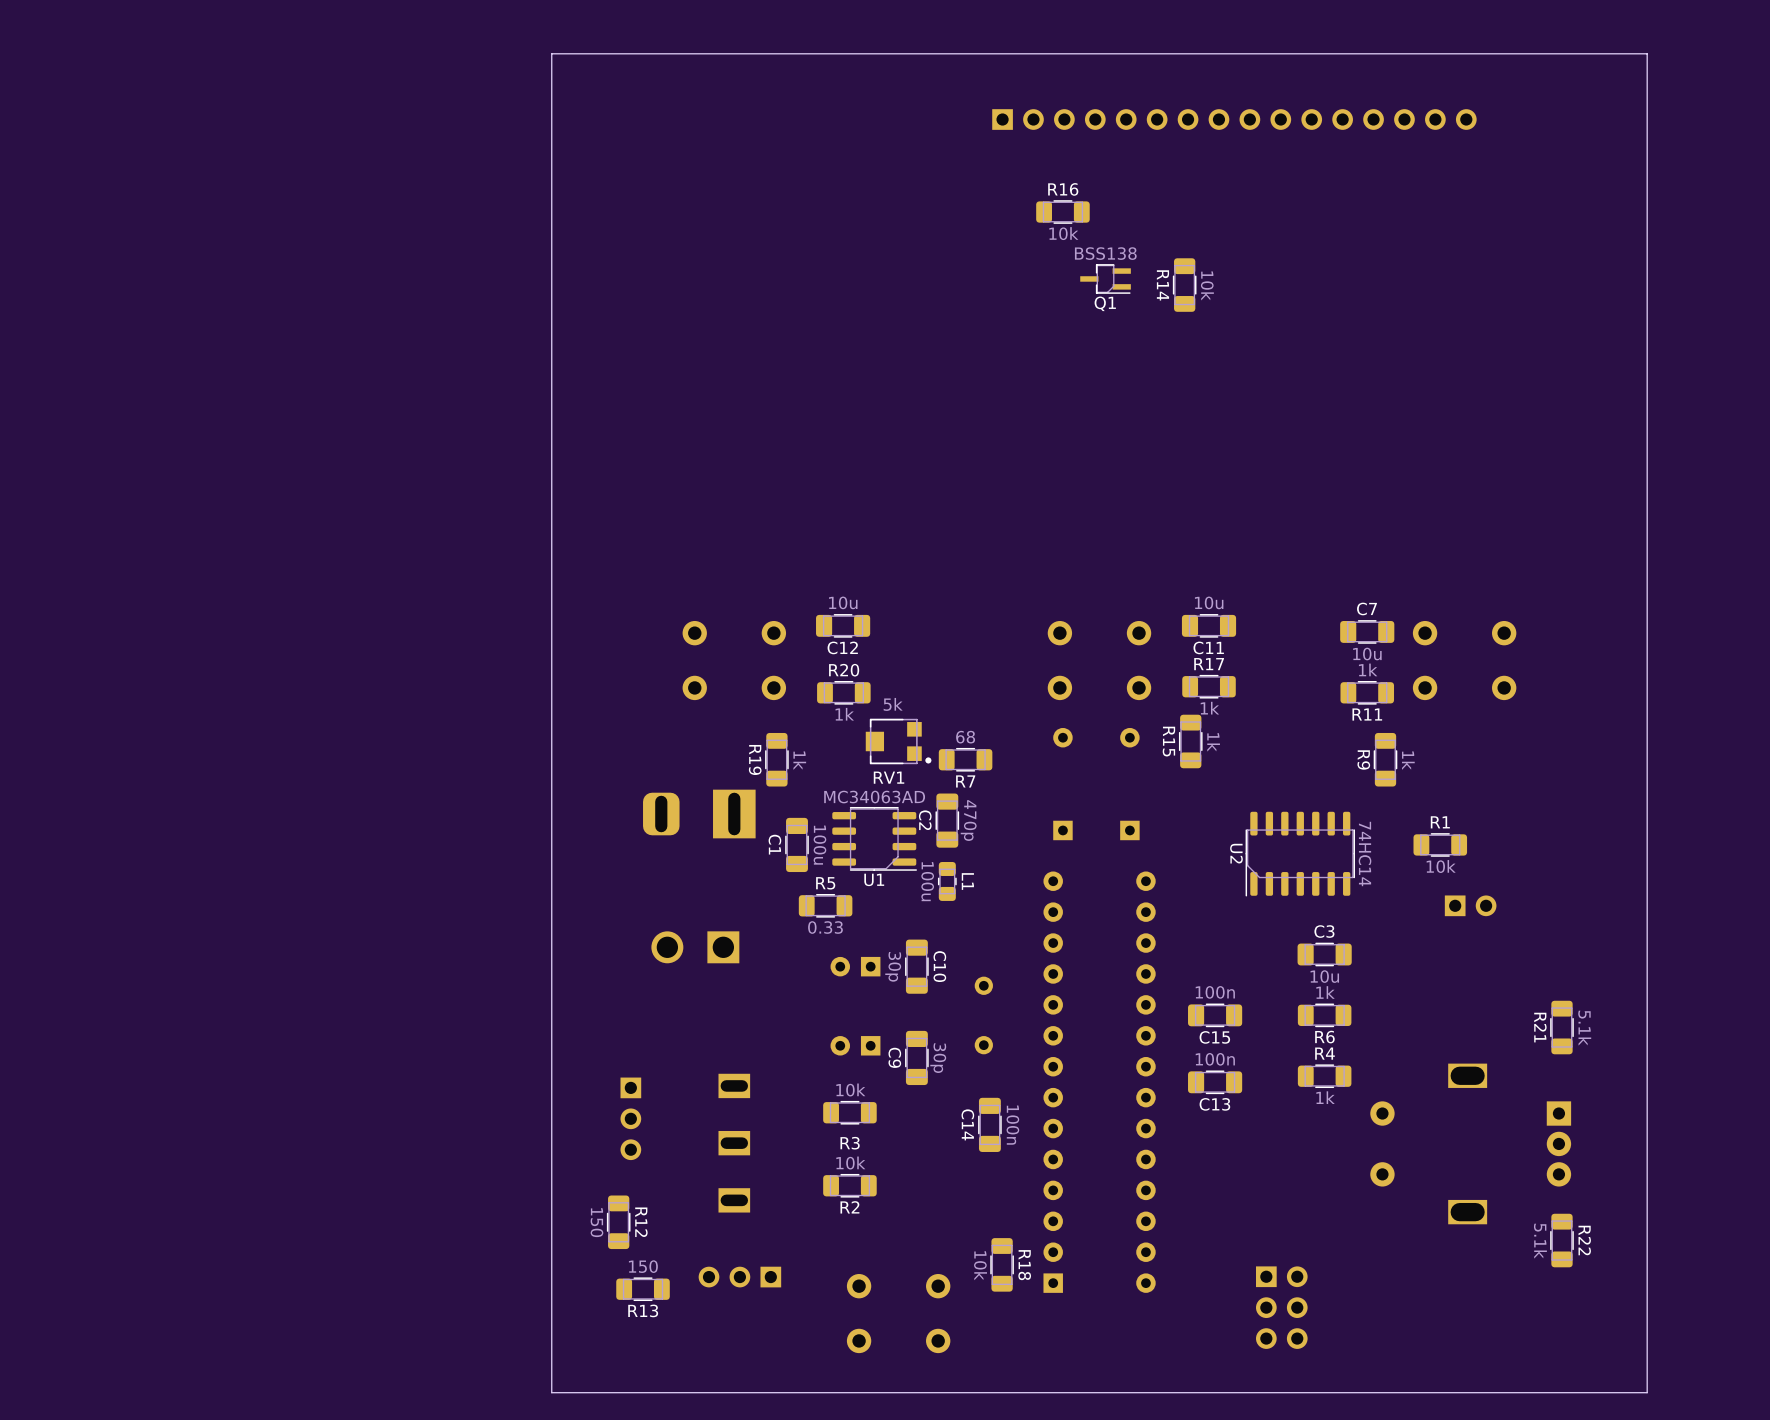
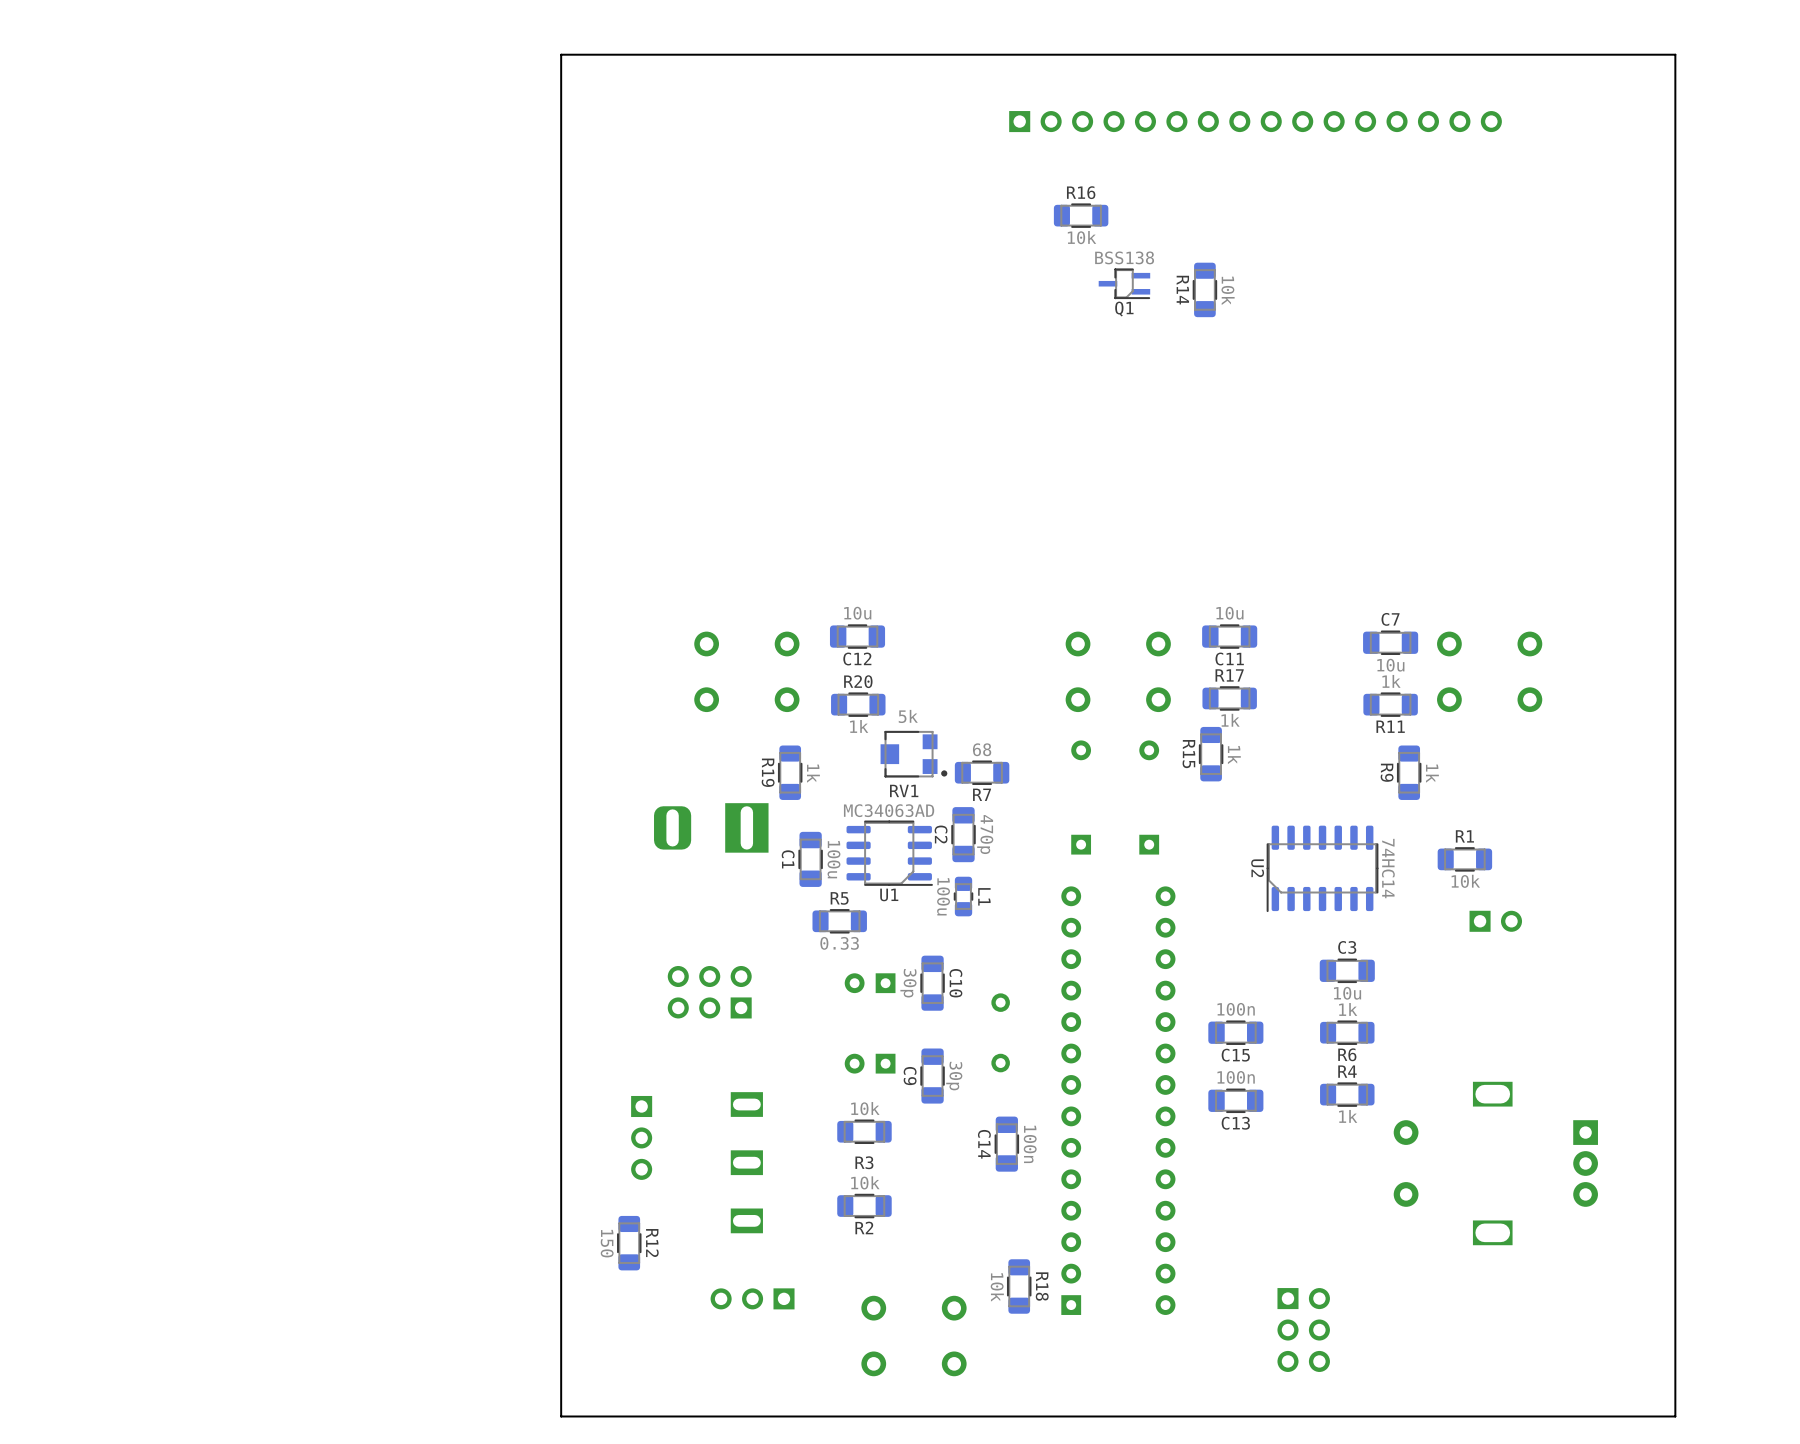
part: (695, 947) -> none
part: none -> (709, 992)
R21: 5.1k (1561, 1027) -> none
R22: 5.1k (1561, 1240) -> none
R13: 150 (643, 1289) -> none

